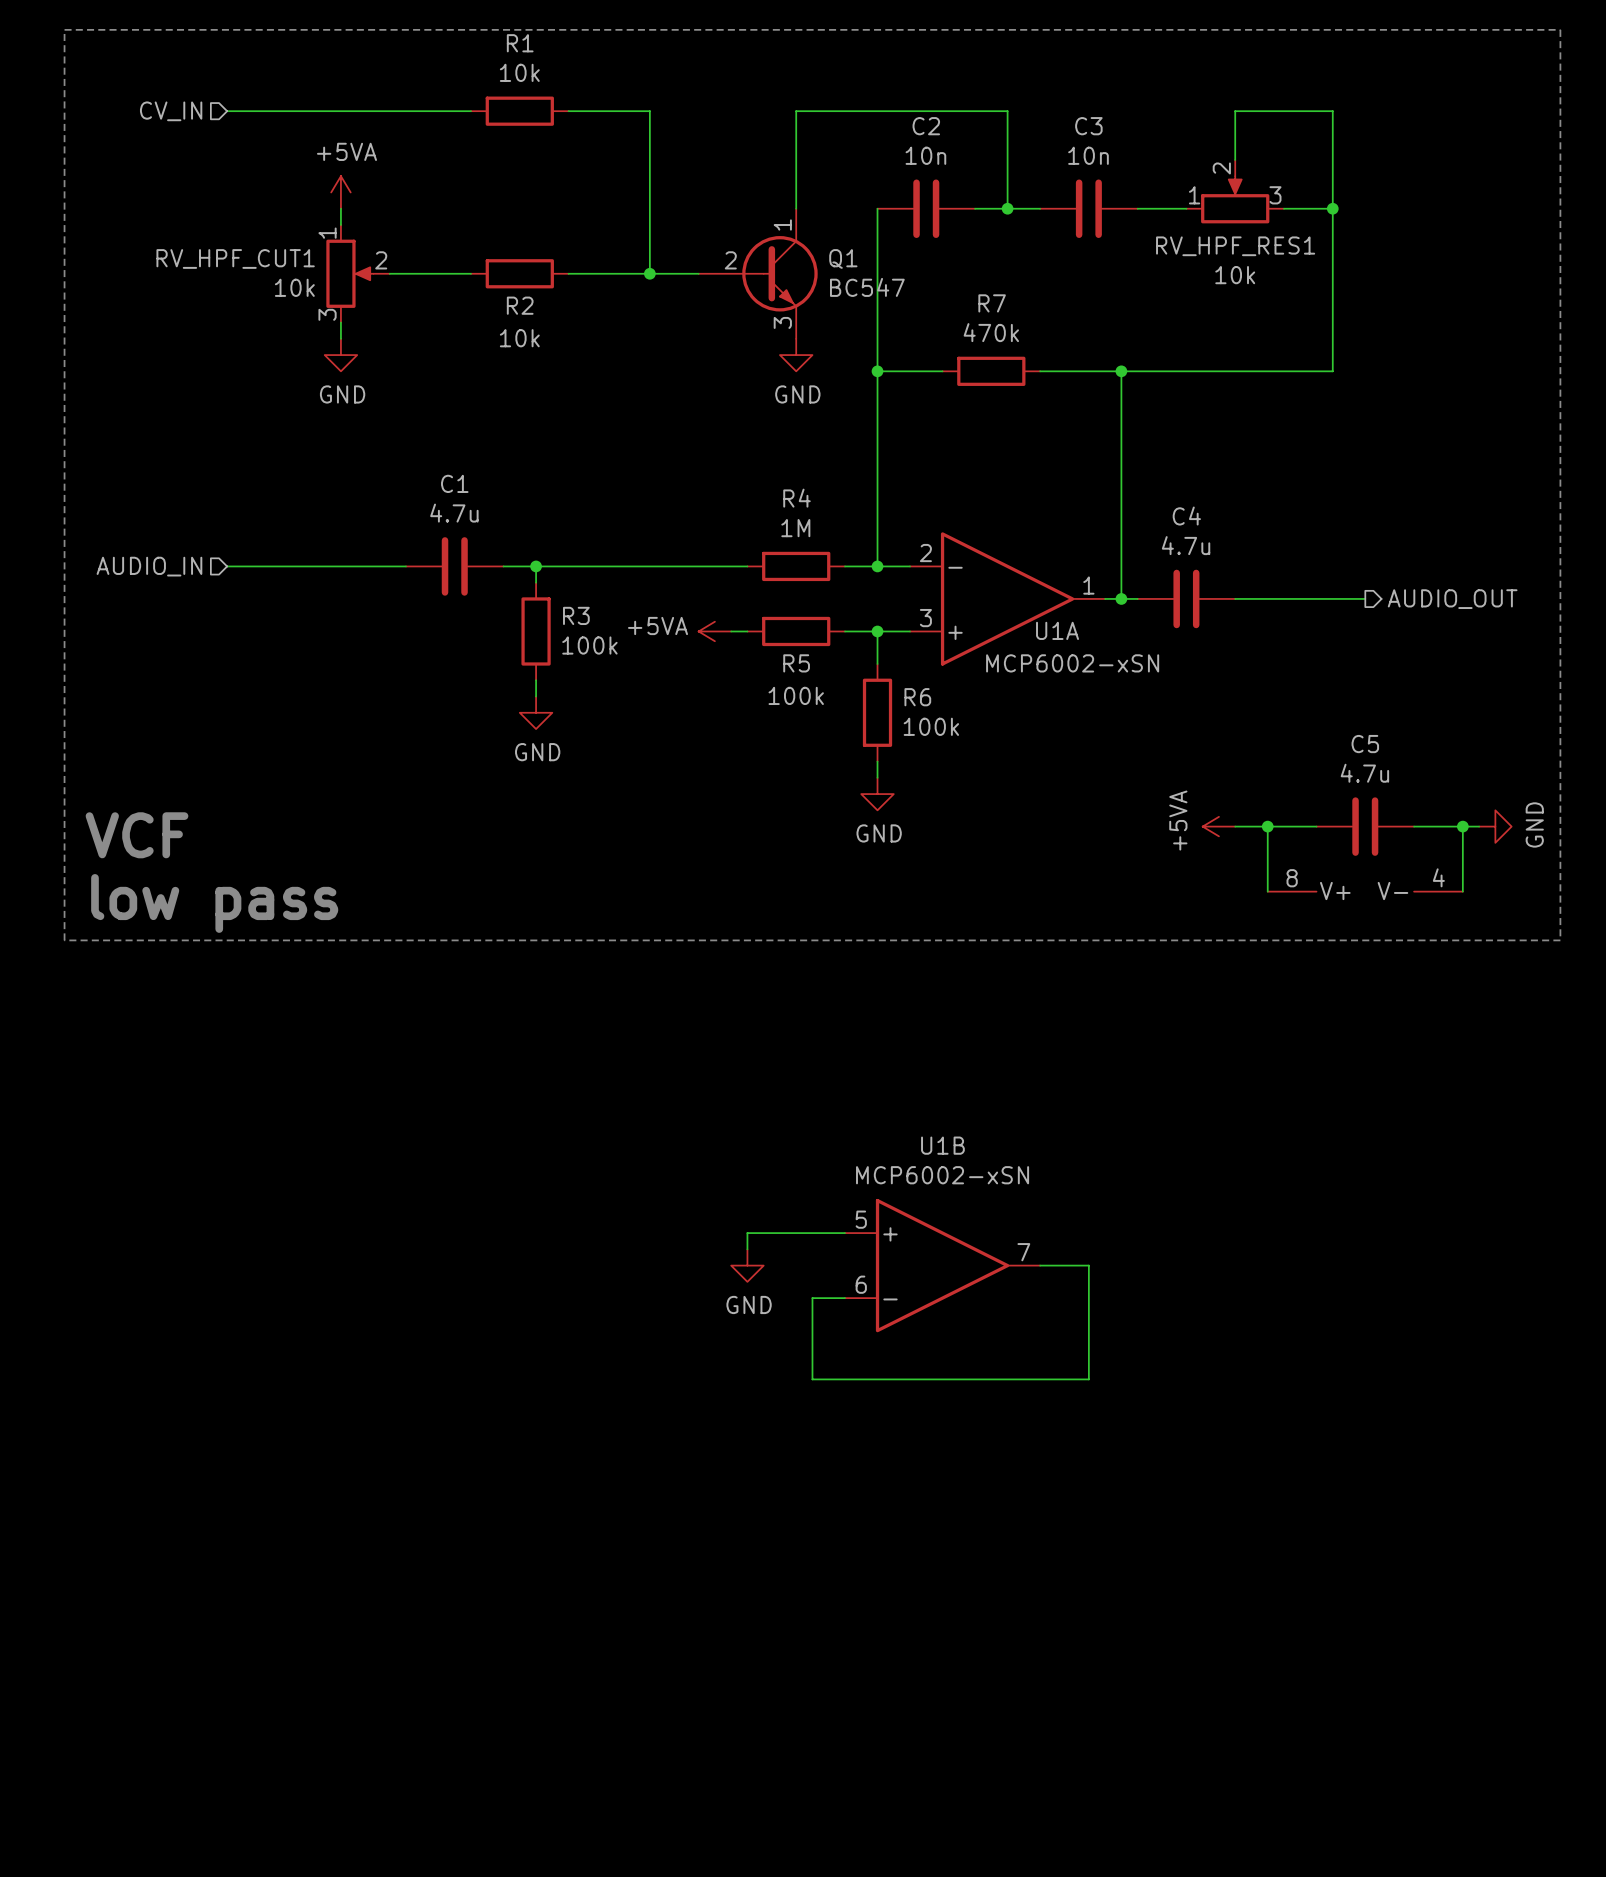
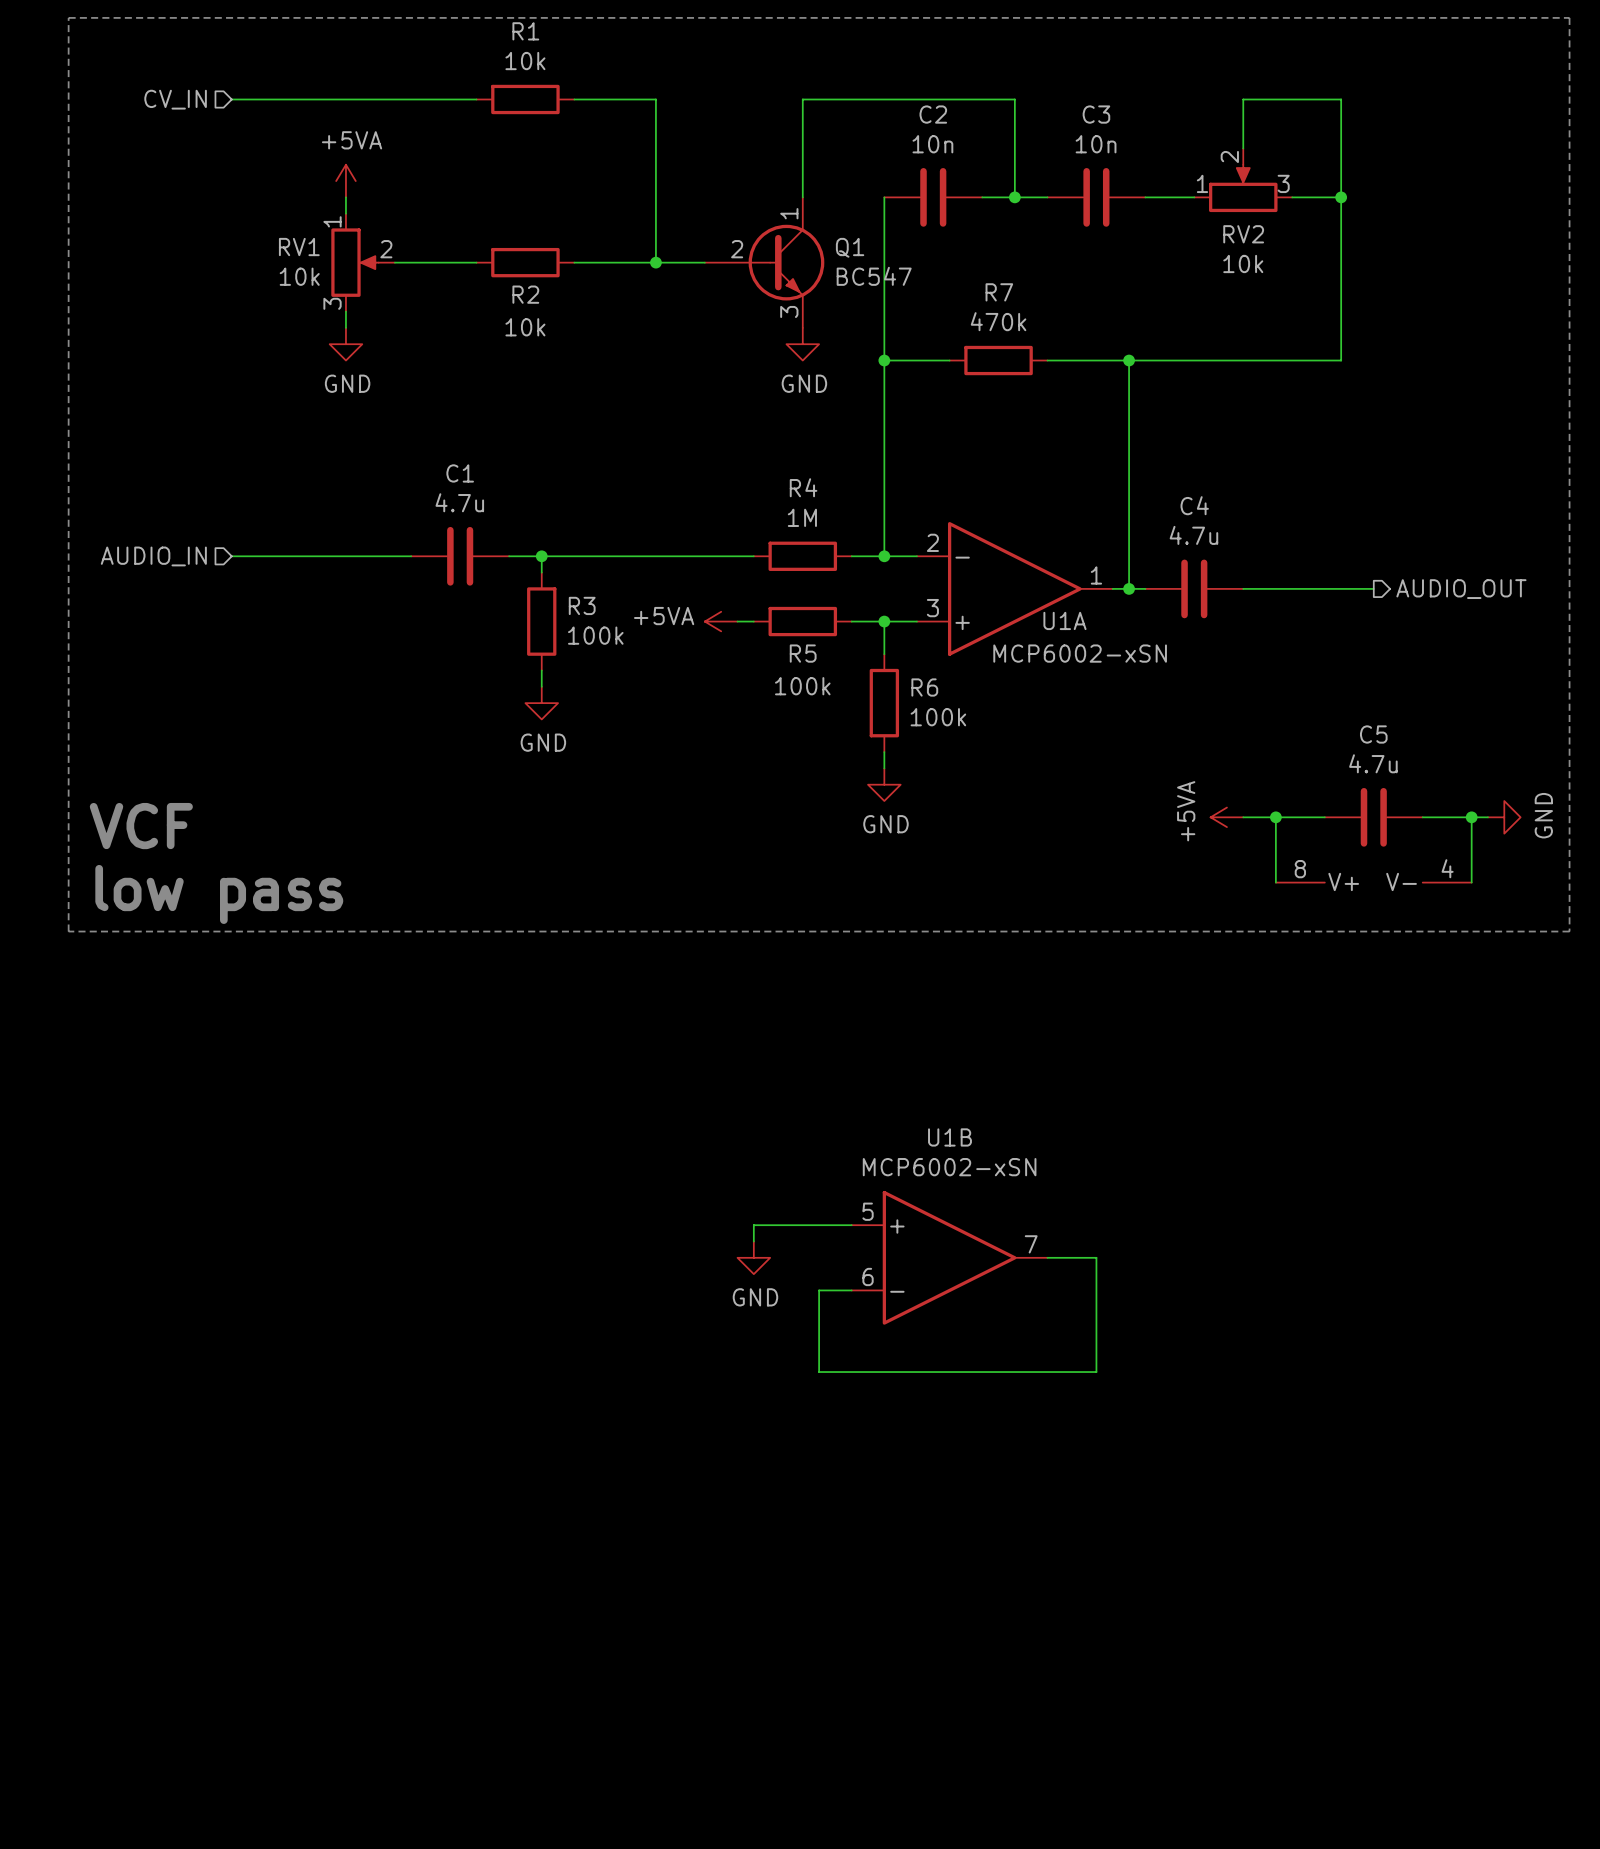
RV_HPF_RES1 name: RV_HPF_RES1 (1235, 246) -> RV2 (1243, 234)
RV_HPF_CUT1 name: RV_HPF_CUT1 (235, 258) -> RV1 (299, 247)

